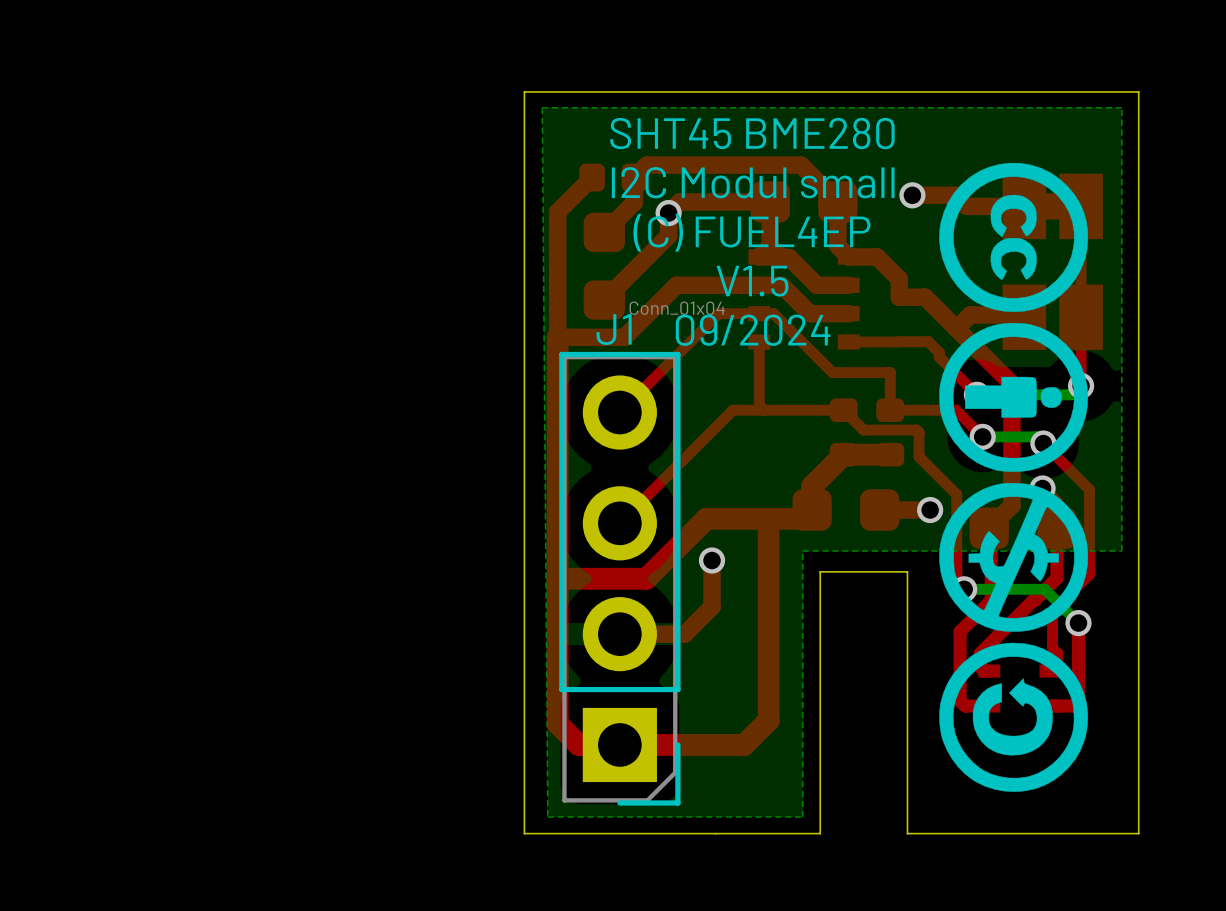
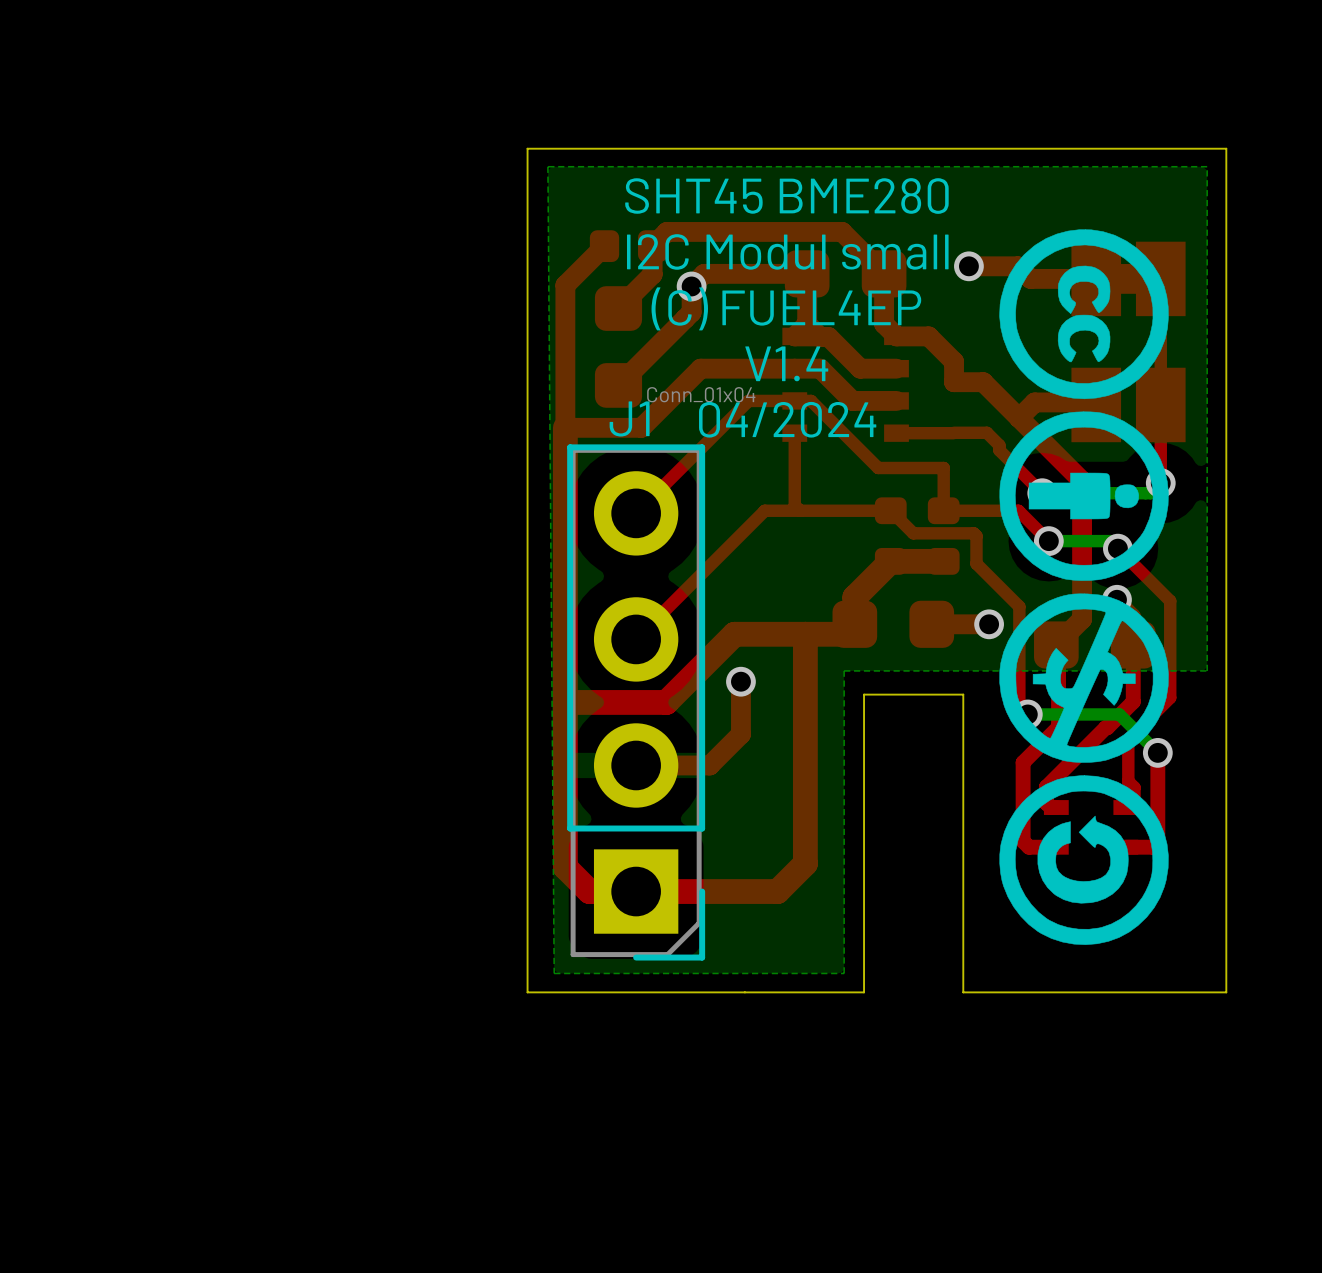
text: V1.5 (752, 281) -> V1.4 (786, 363)
text: 09/2024 (753, 330) -> 04/2024 (787, 419)

